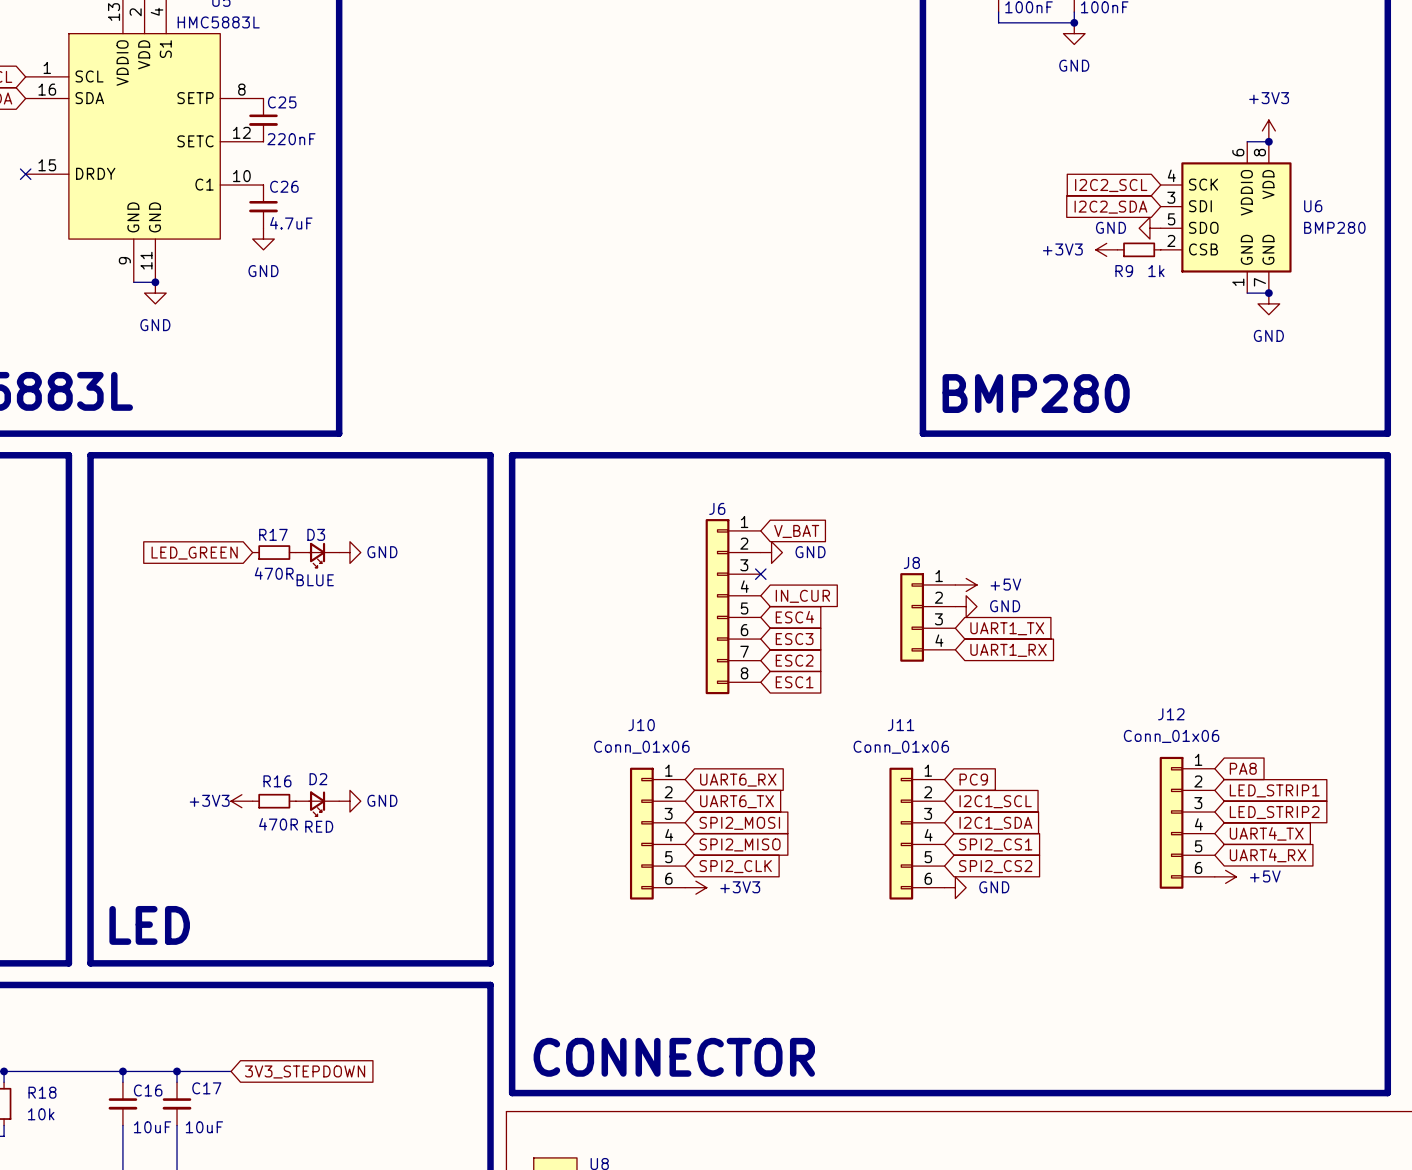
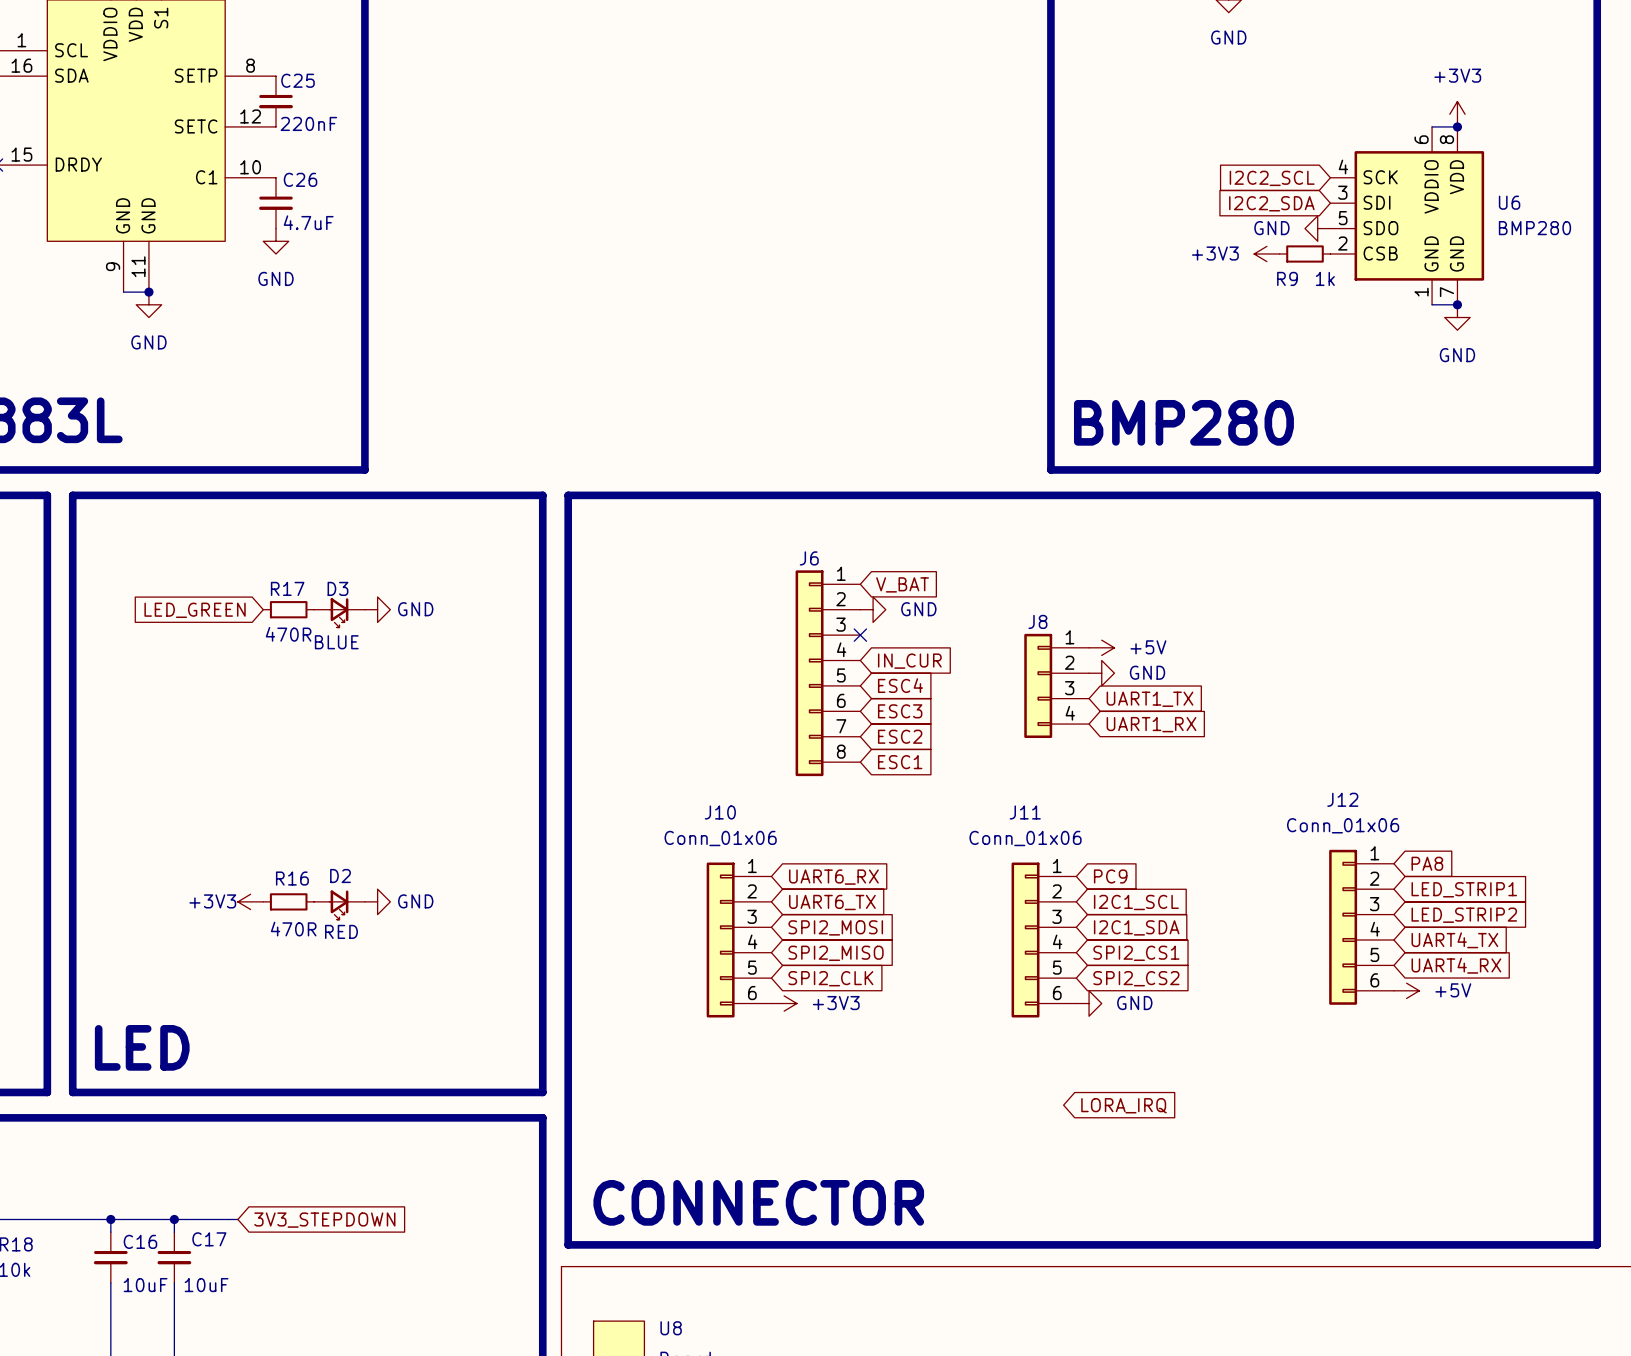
global label: none -> LORA_IRQ (1123, 1105)

